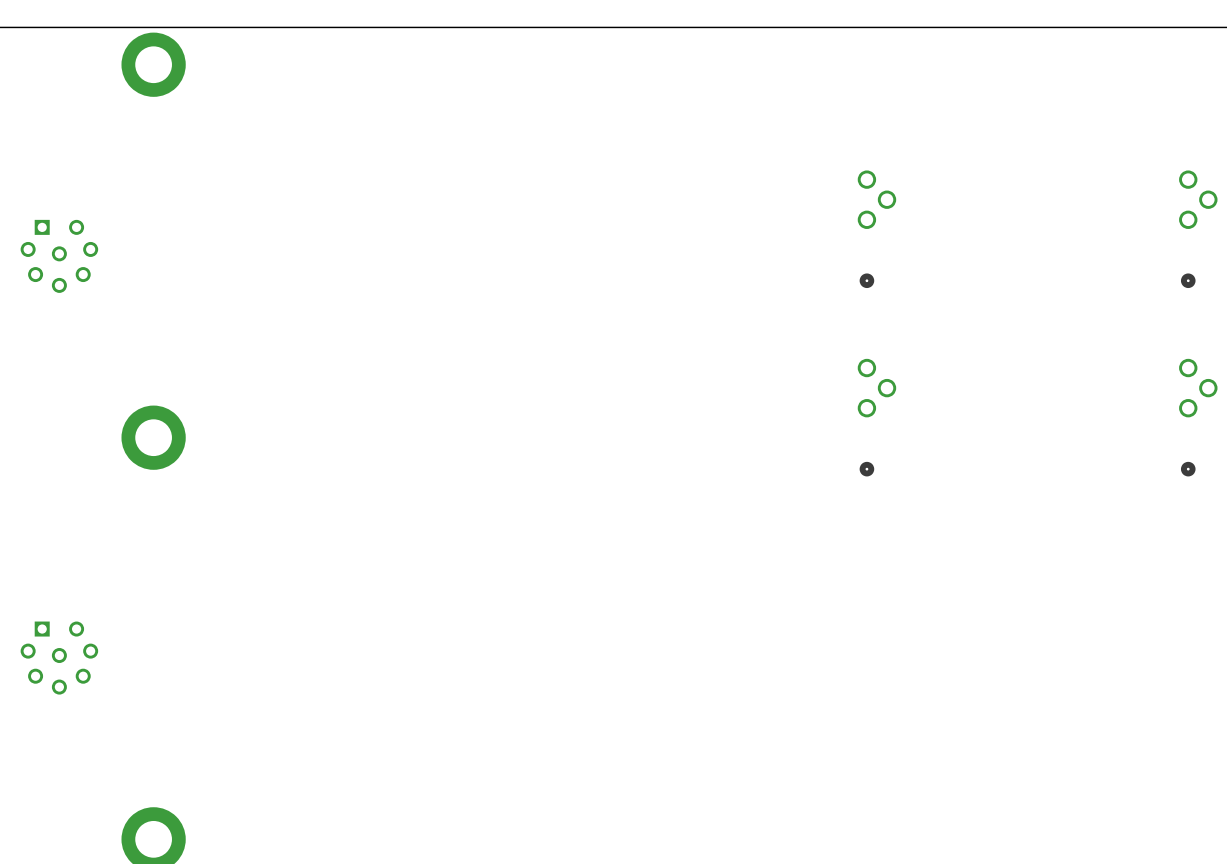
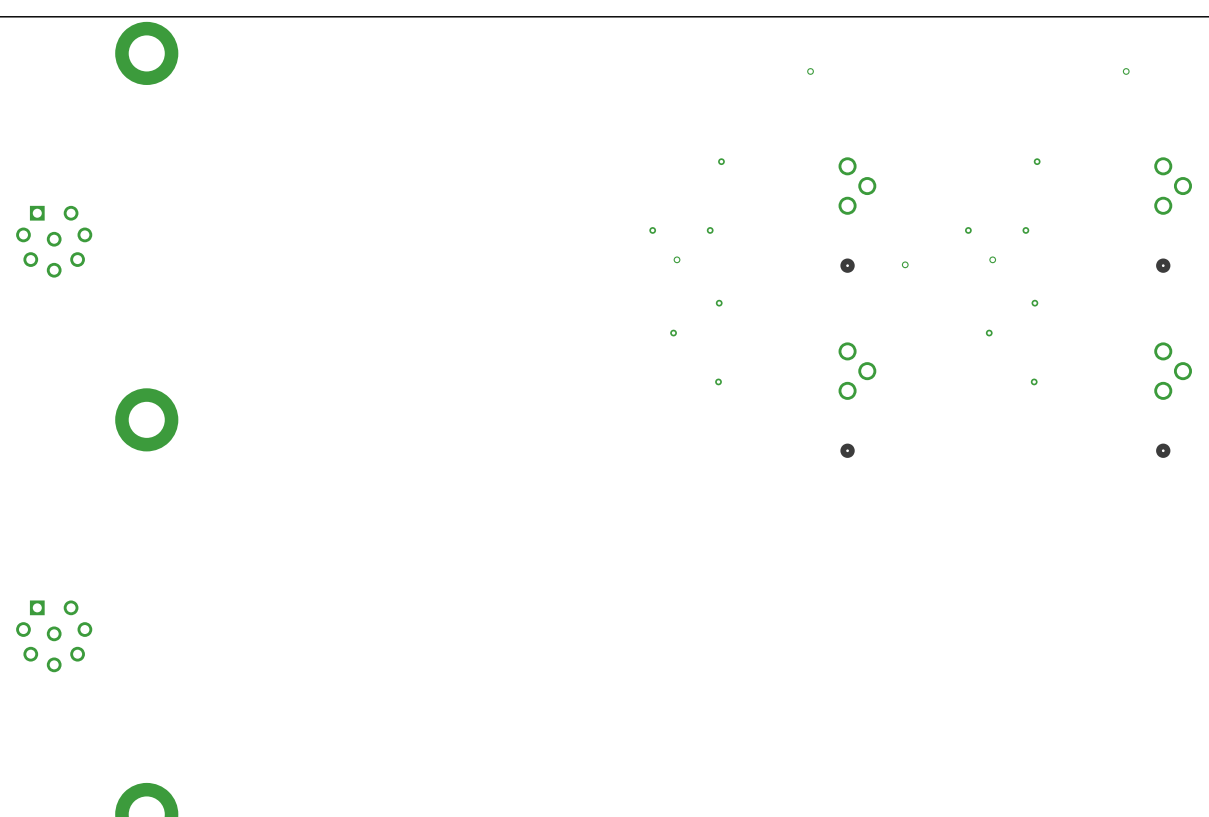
via: none -> (810, 71)
via: none -> (1126, 71)
via: none -> (721, 161)
via: none -> (1037, 161)
via: none -> (652, 230)
via: none -> (710, 230)
via: none -> (968, 230)
via: none -> (1025, 230)
via: none -> (677, 259)
via: none -> (992, 259)
via: none -> (905, 264)
via: none -> (719, 303)
via: none -> (1034, 303)
via: none -> (673, 333)
via: none -> (989, 333)
via: none -> (718, 381)
via: none -> (1034, 381)

